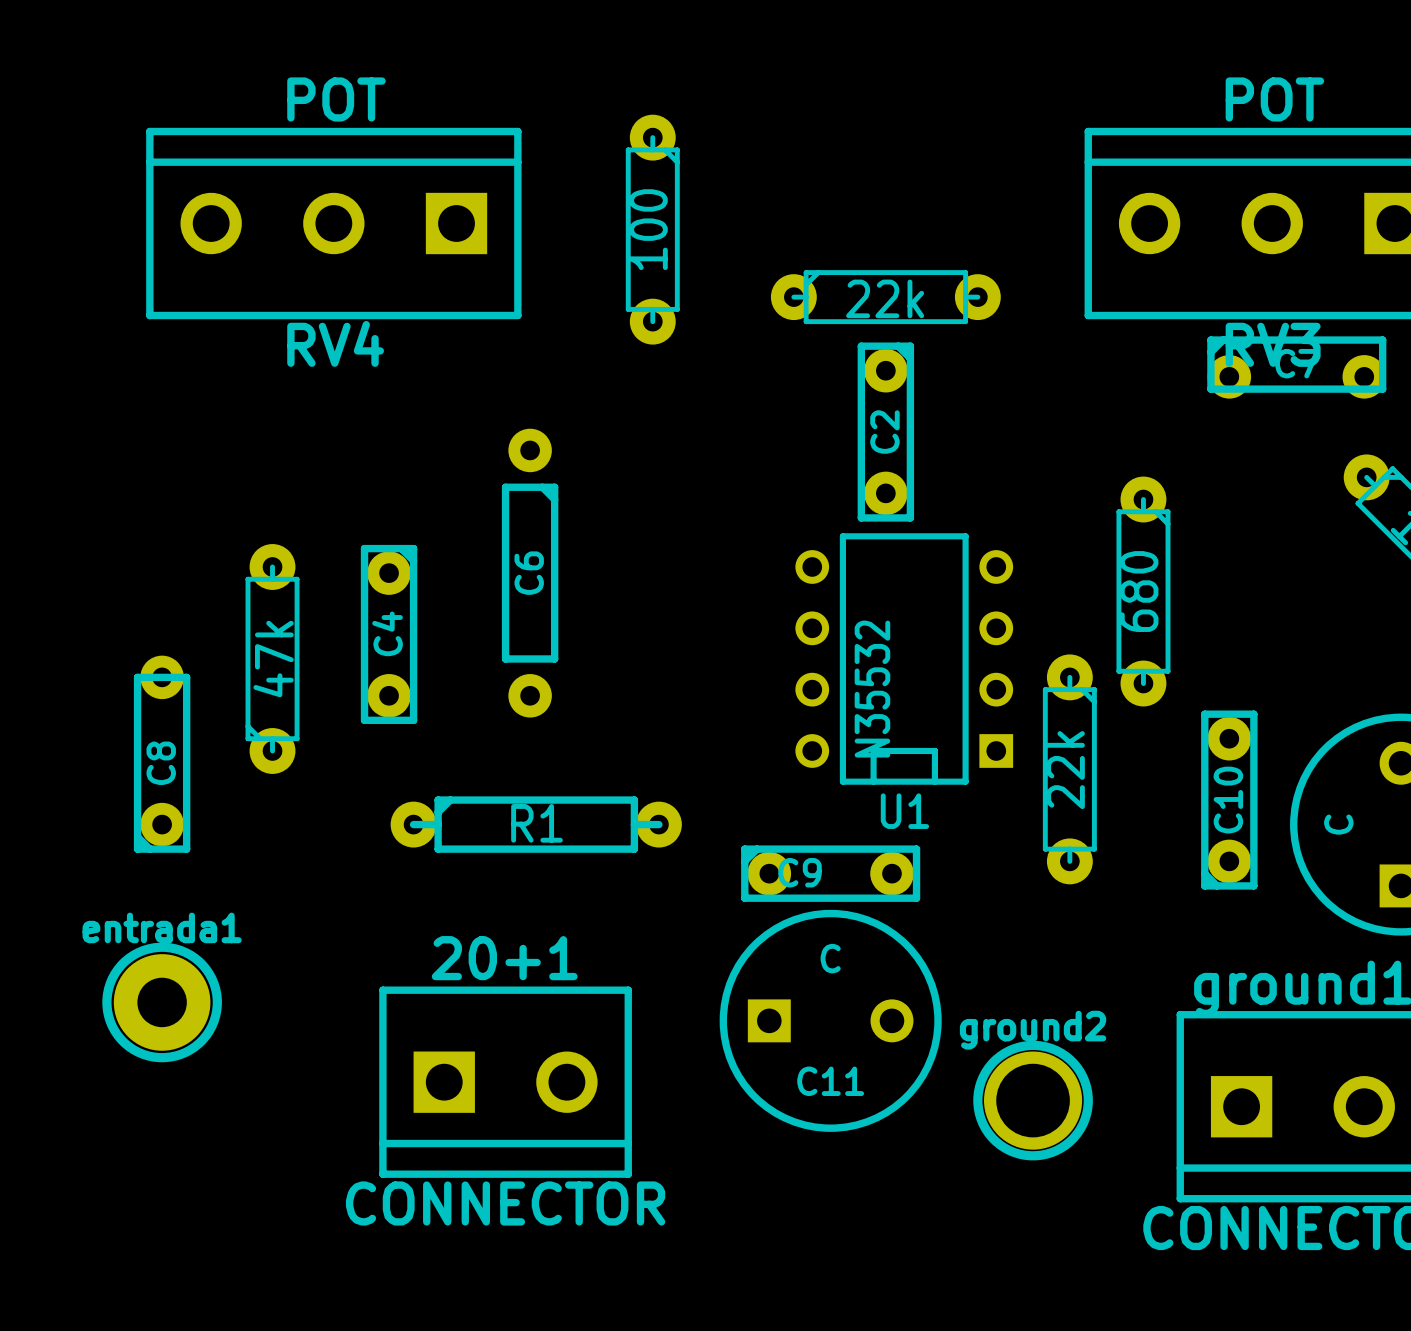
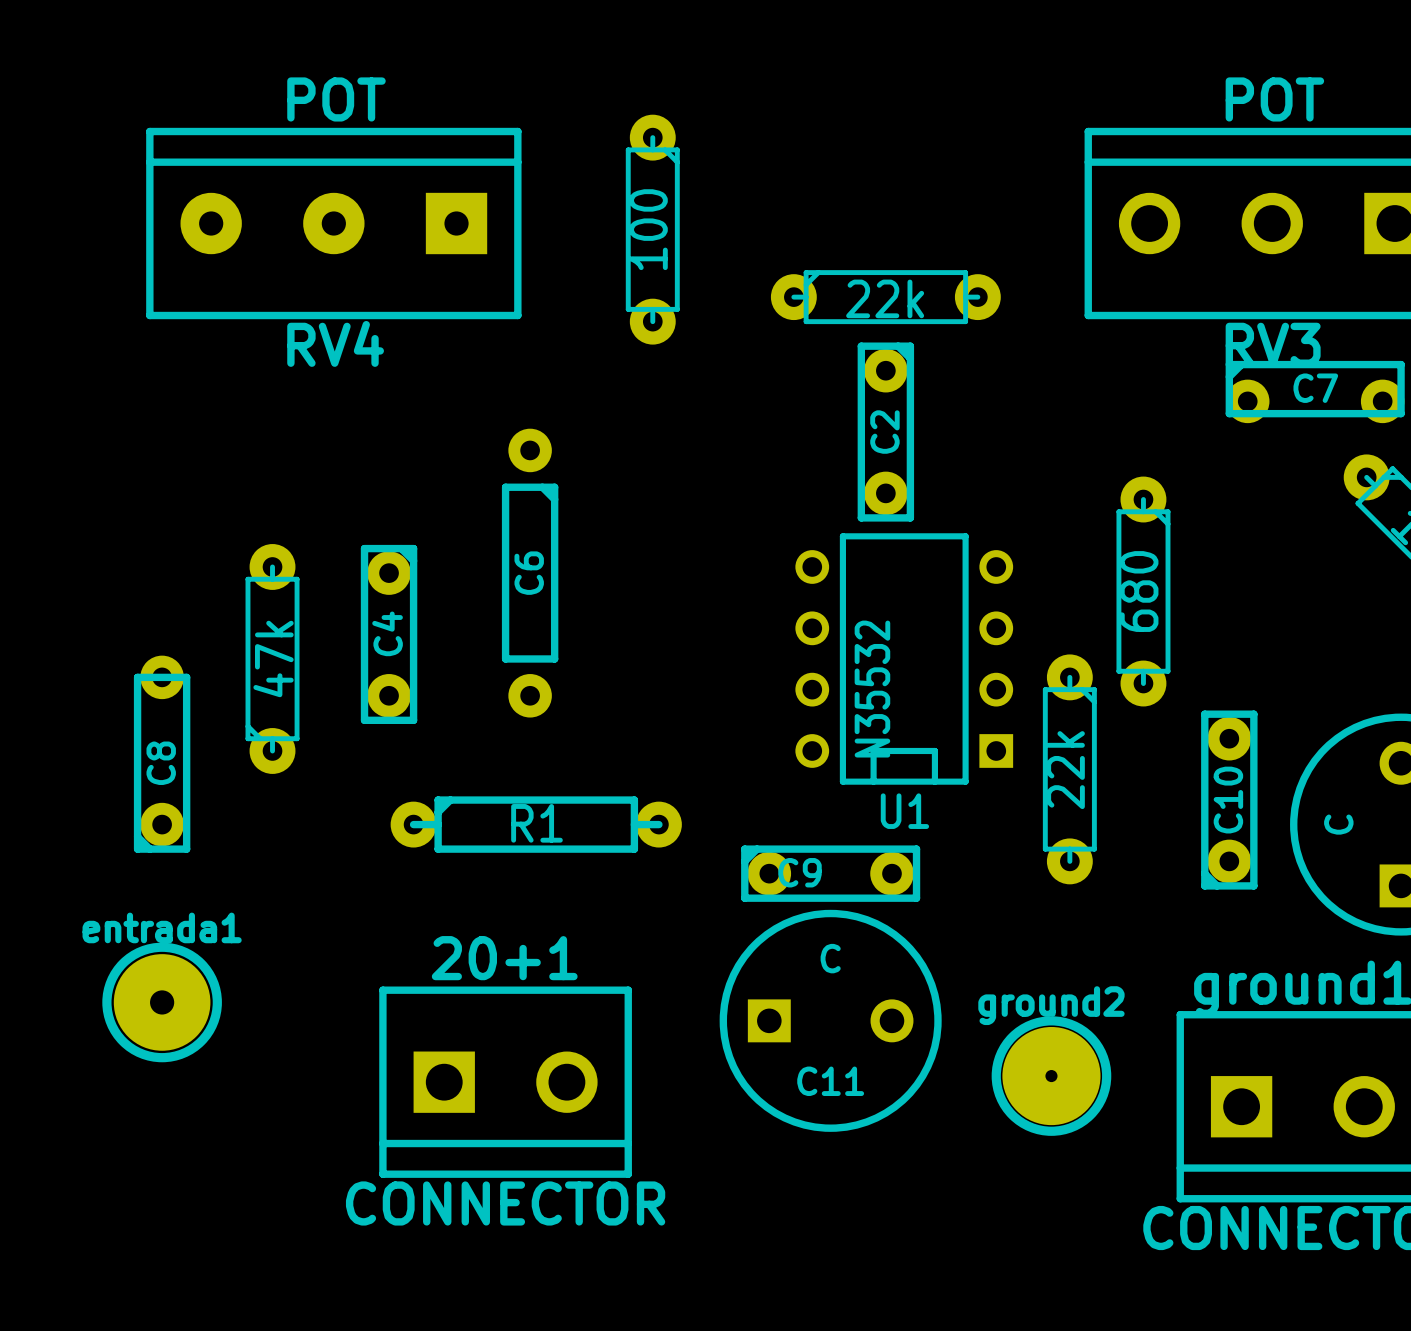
RV4 footprint: [146, 127, 522, 320] -> [146, 127, 522, 320]
C7 position: (1296, 367) -> (1315, 392)
entrada1 footprint: [102, 942, 222, 1063] -> [102, 942, 222, 1063]
ground2 footprint: [973, 1040, 1093, 1161] -> [991, 1016, 1112, 1136]

